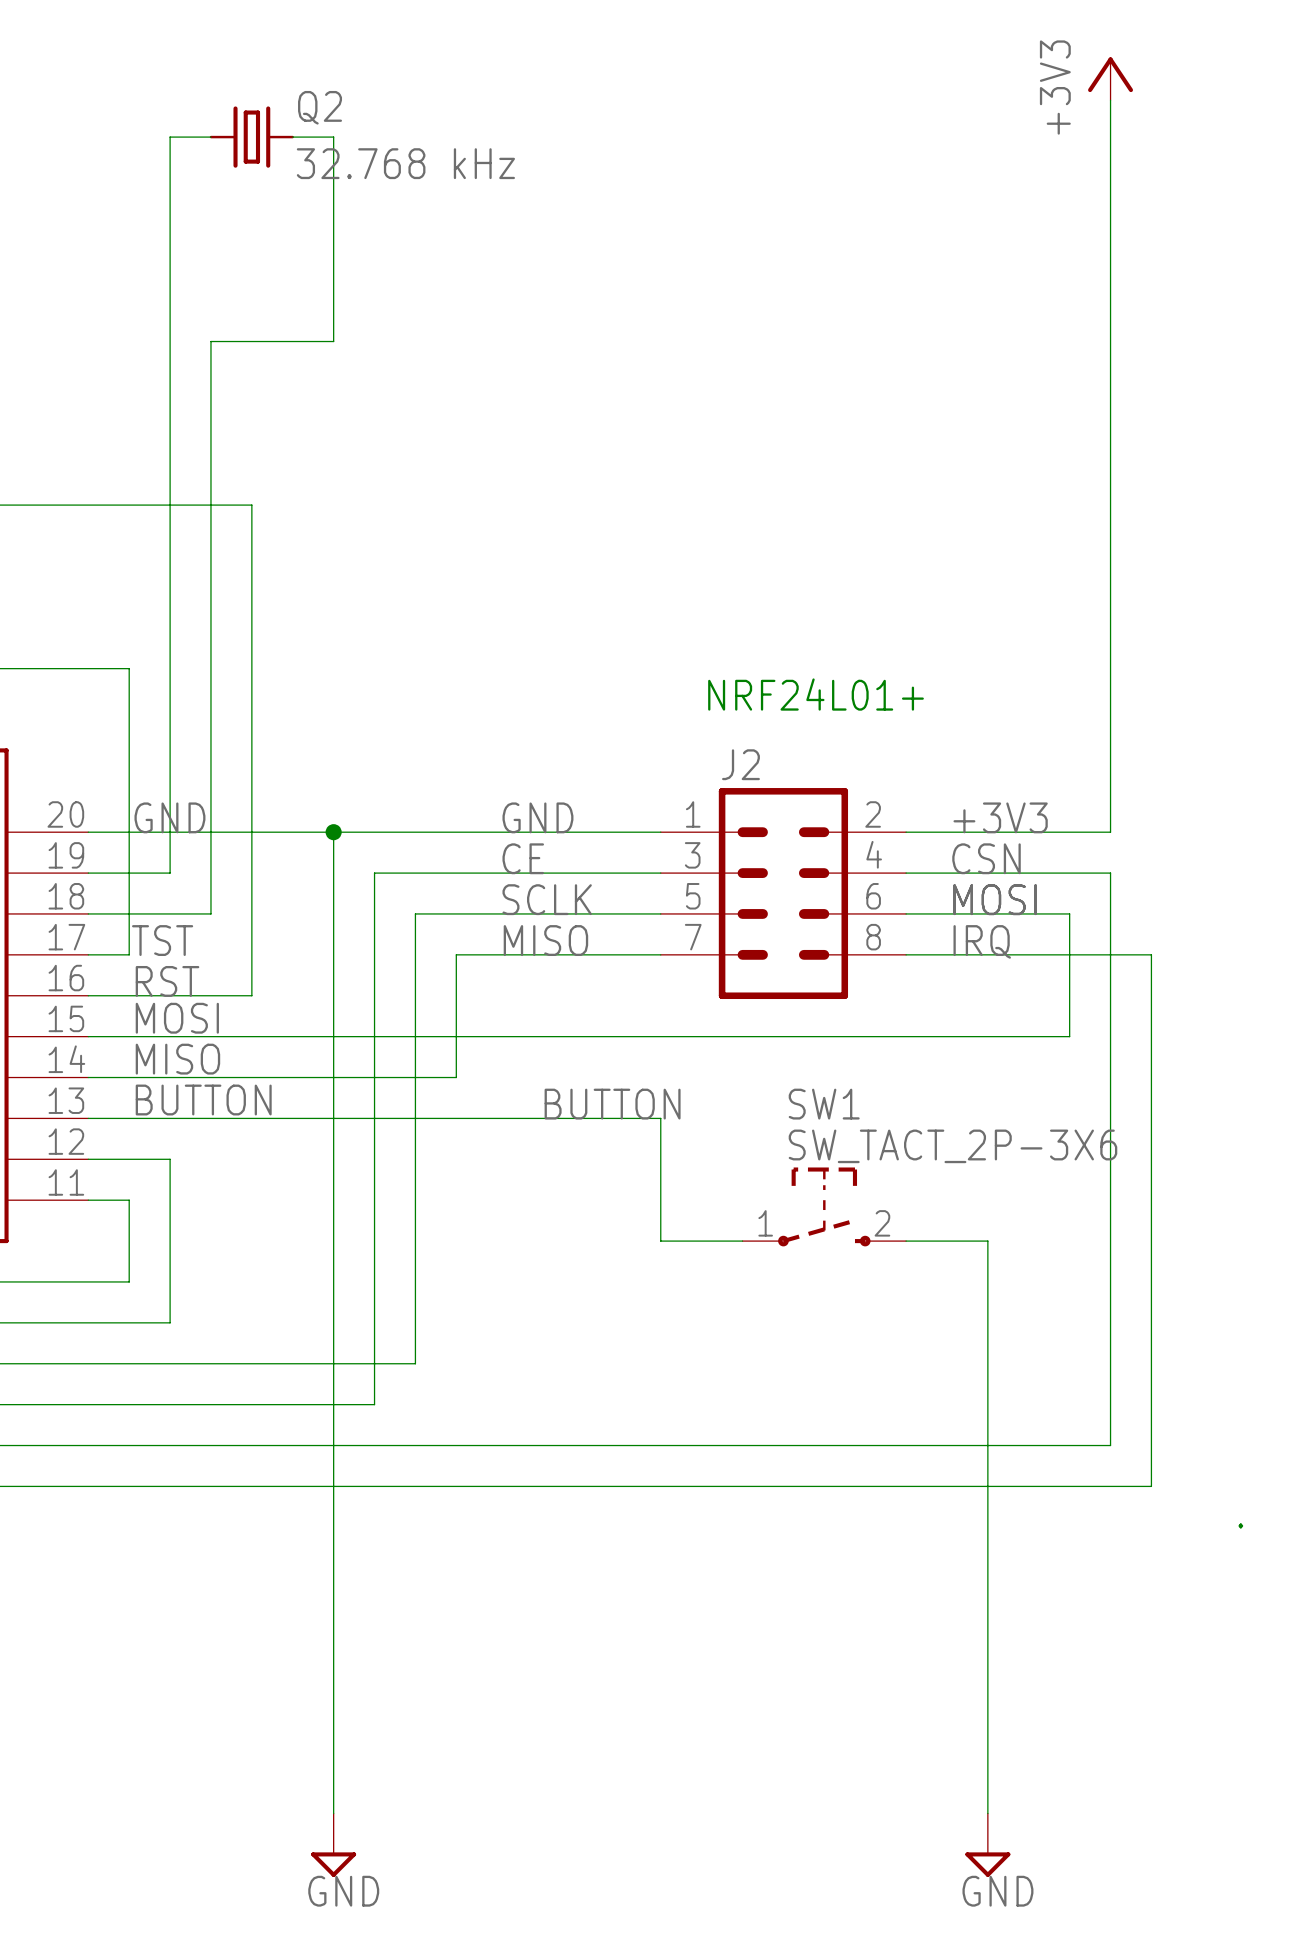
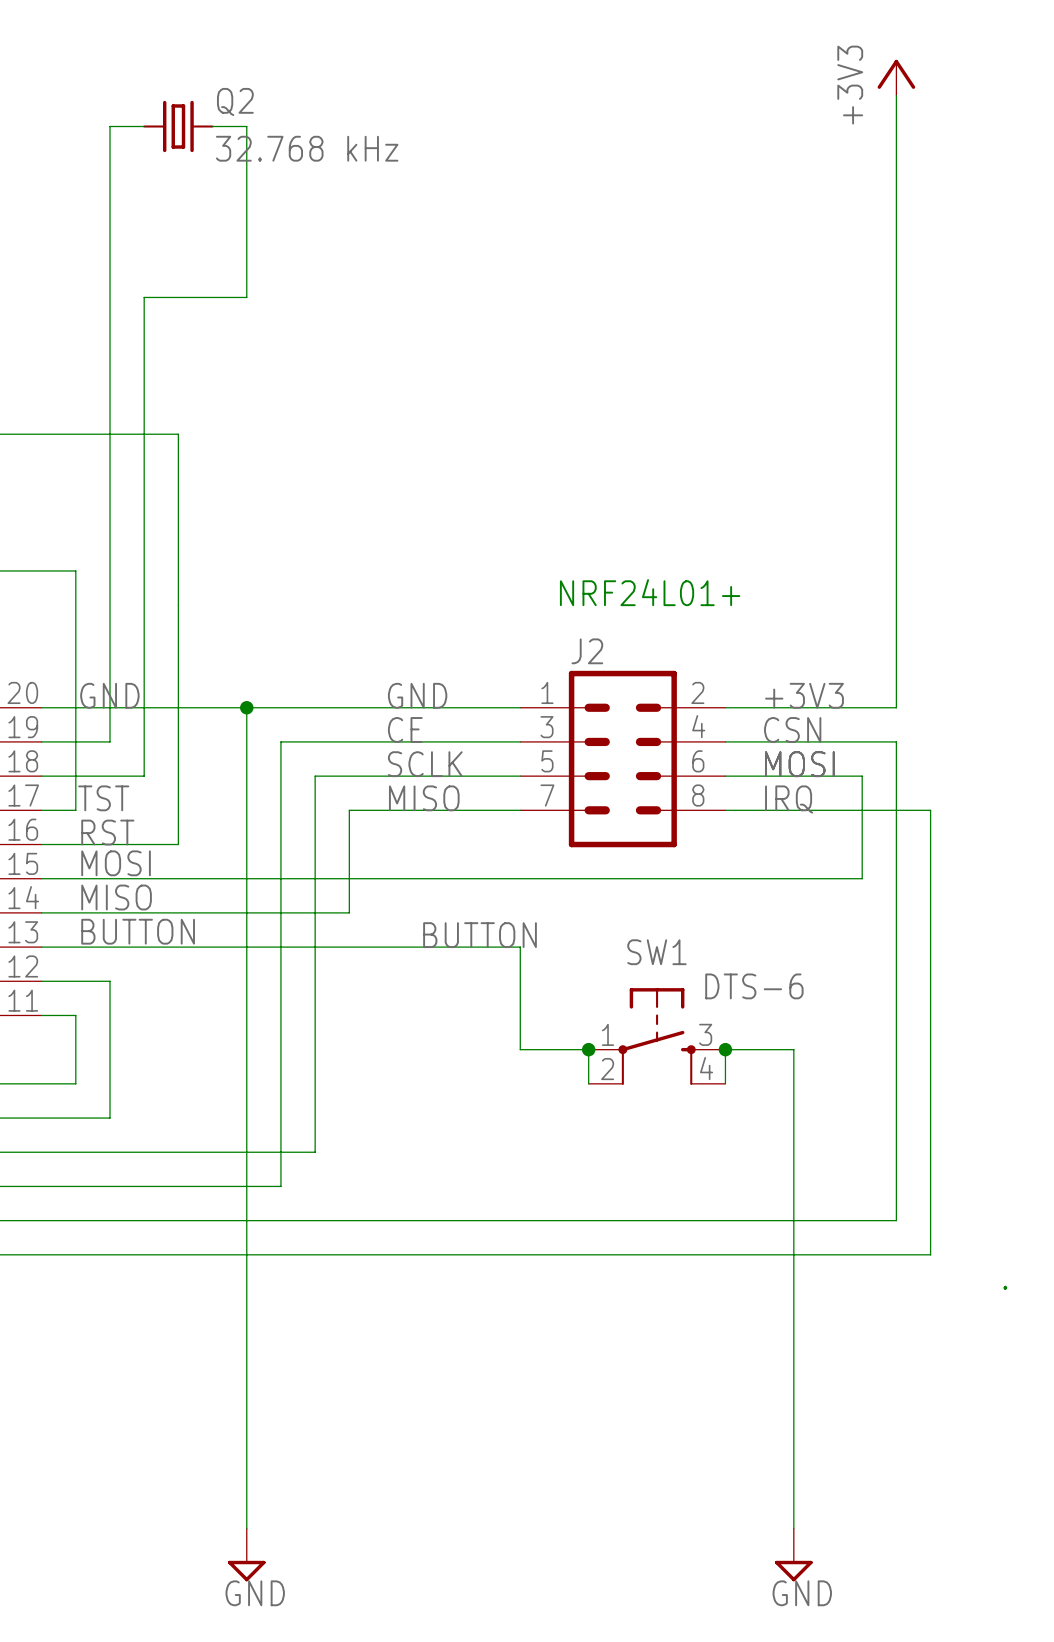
SW1 value: SW_TACT_2P-3X6 (952, 1146) -> DTS-6 (754, 986)
SW1 symbol: [742, 1167, 907, 1247] -> [588, 988, 726, 1085]
wire: none -> (588, 1049) (588, 1083)
junction: none -> (588, 1049)
wire: none -> (725, 1049) (725, 1083)
junction: none -> (725, 1049)

